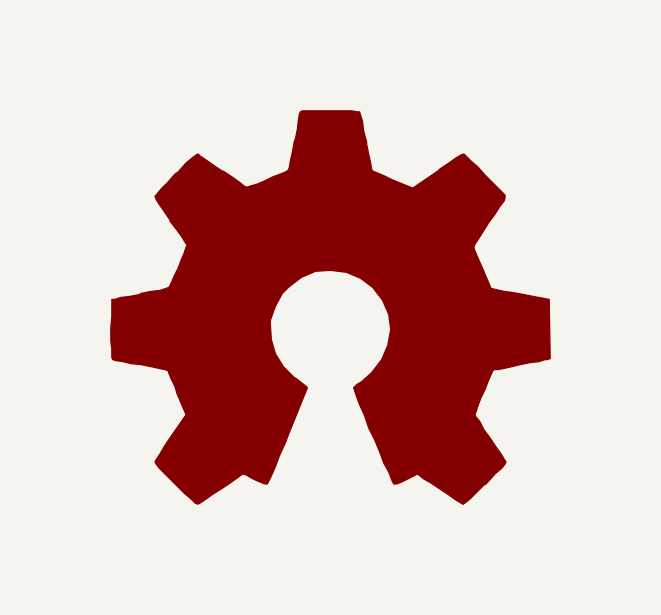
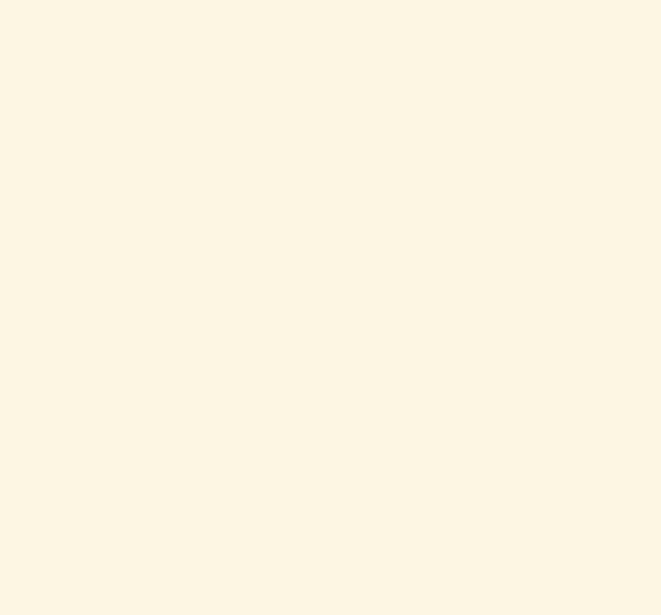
power symbol: (330, 307) -> none

